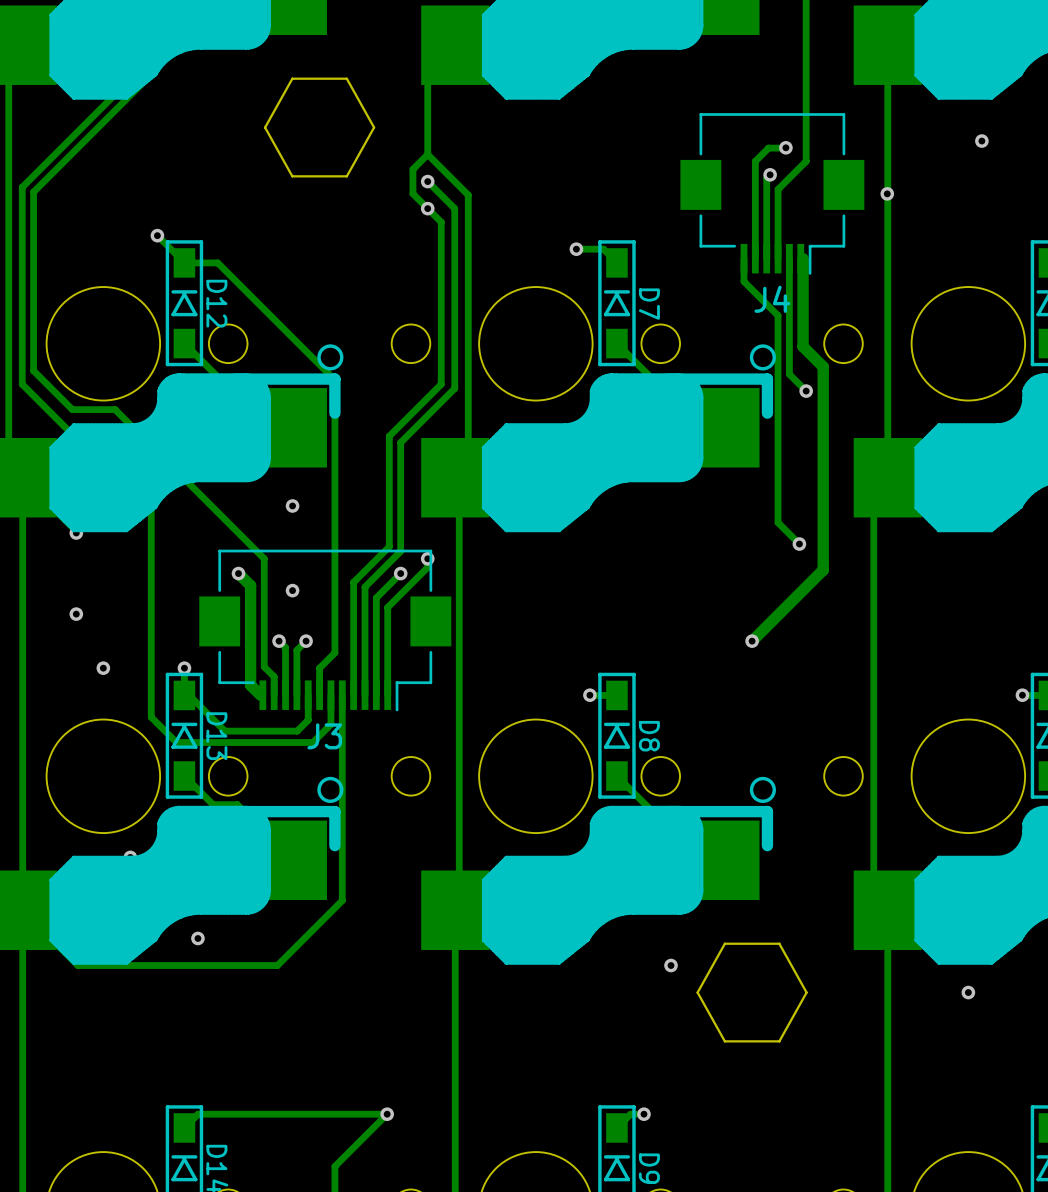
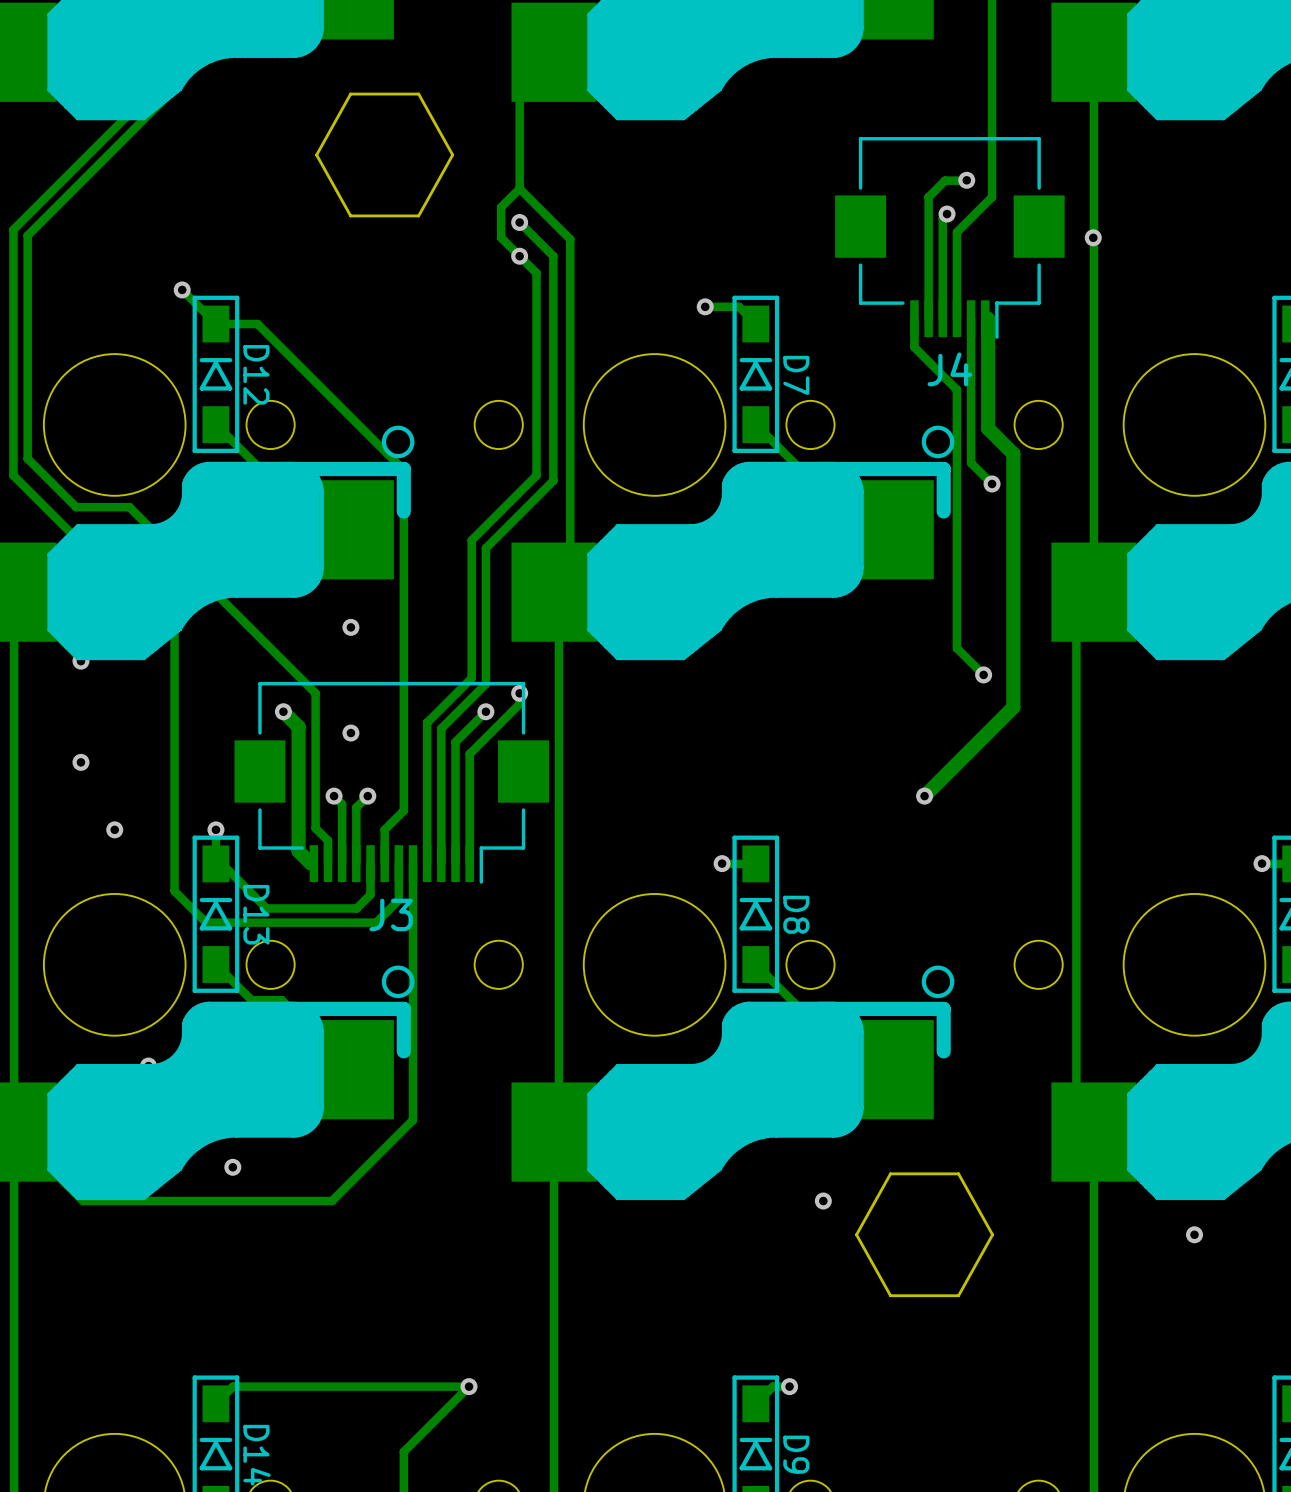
via: (981, 141) -> none

